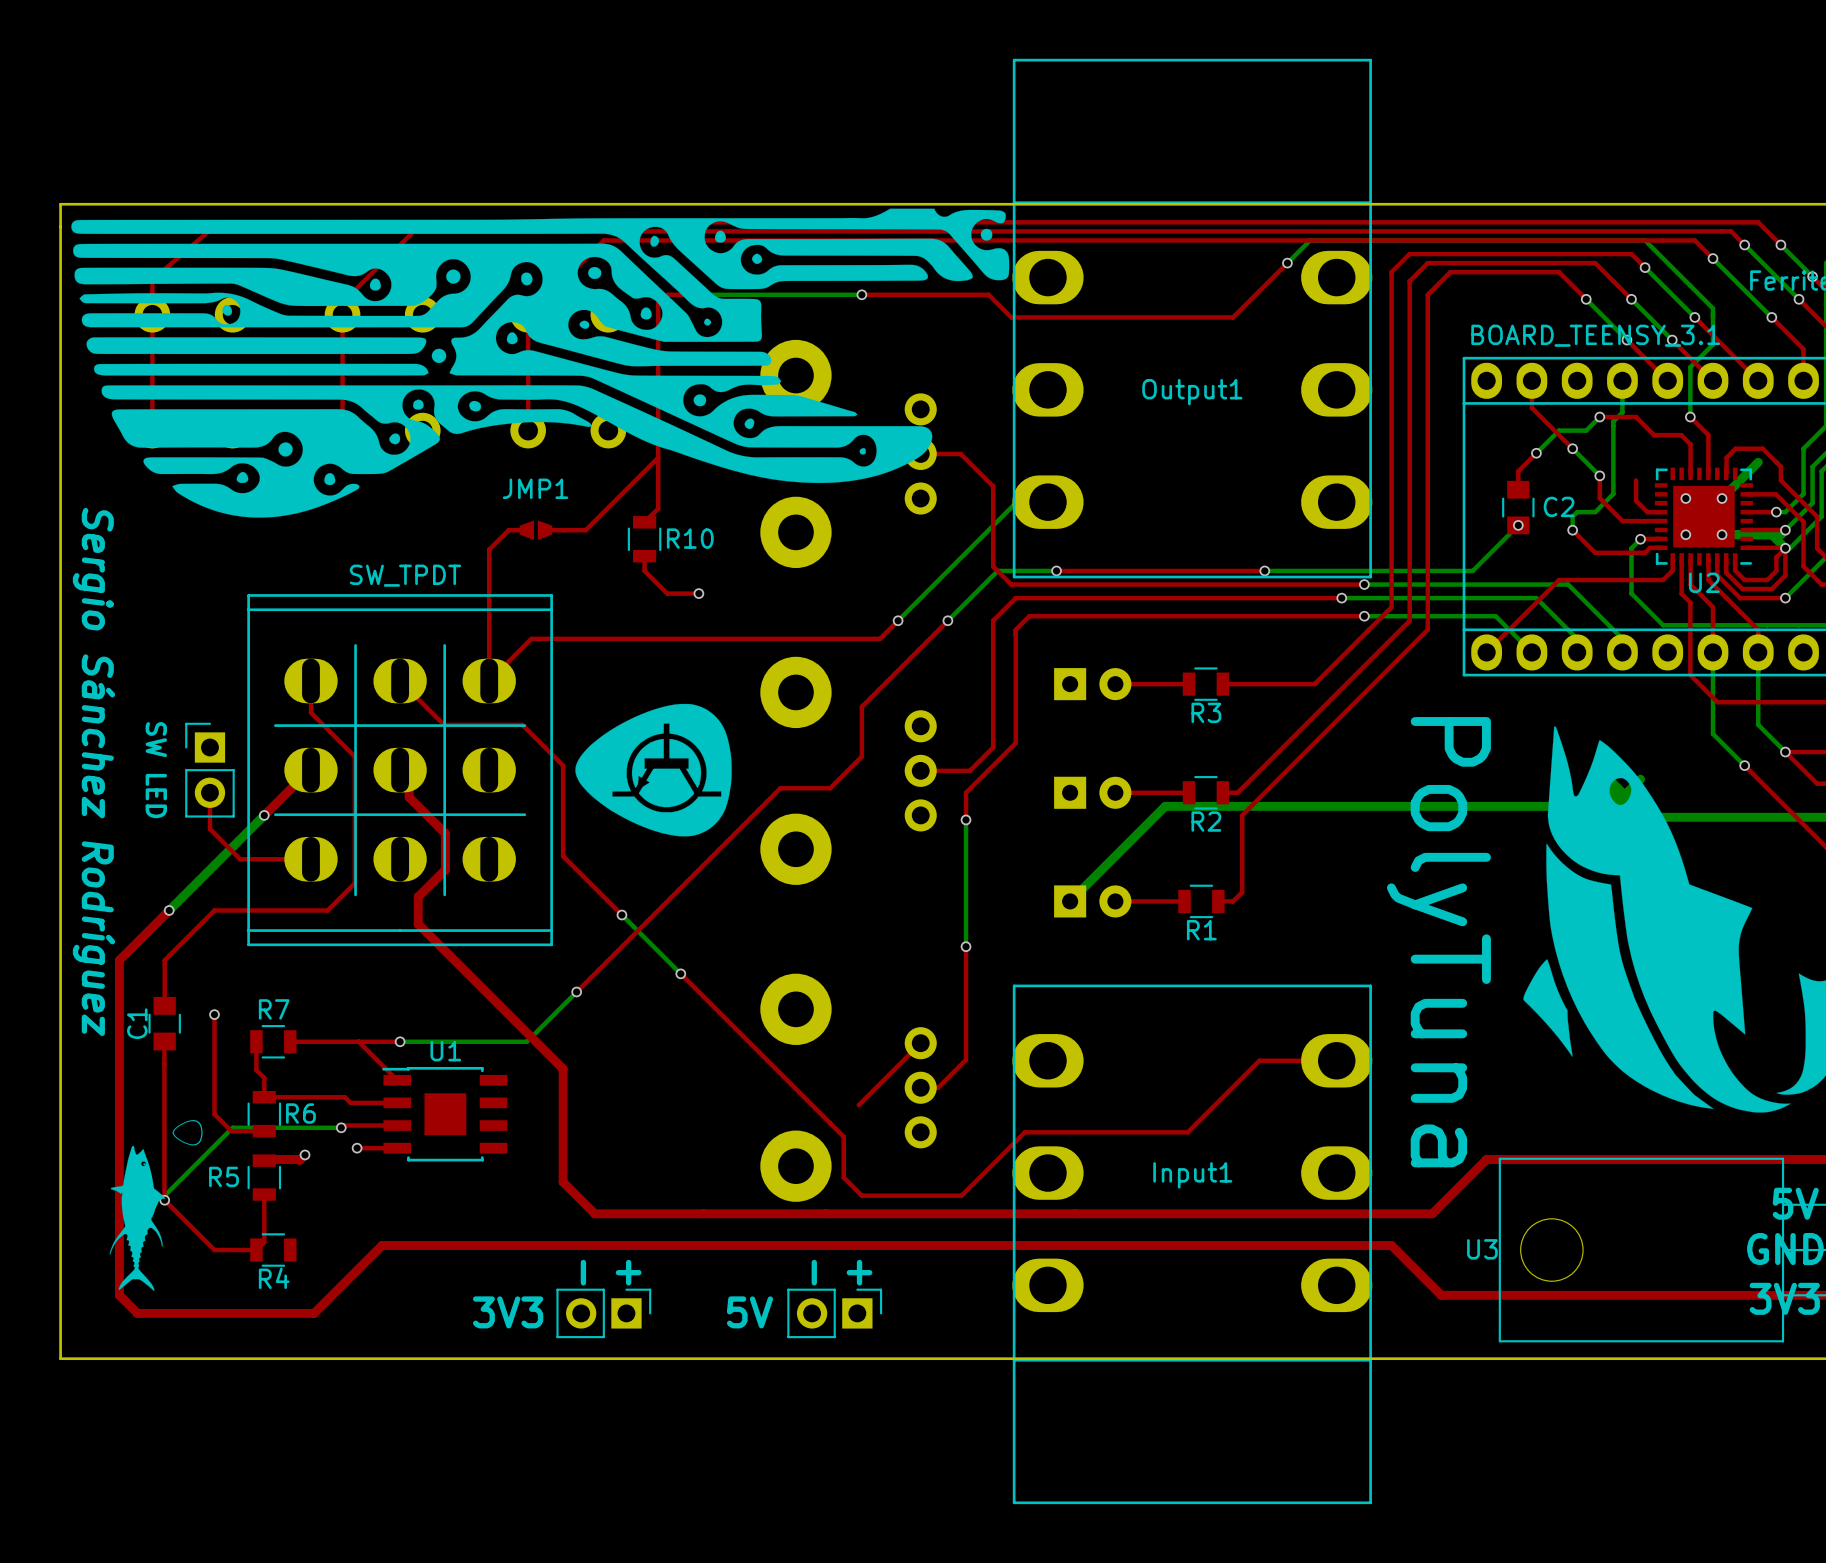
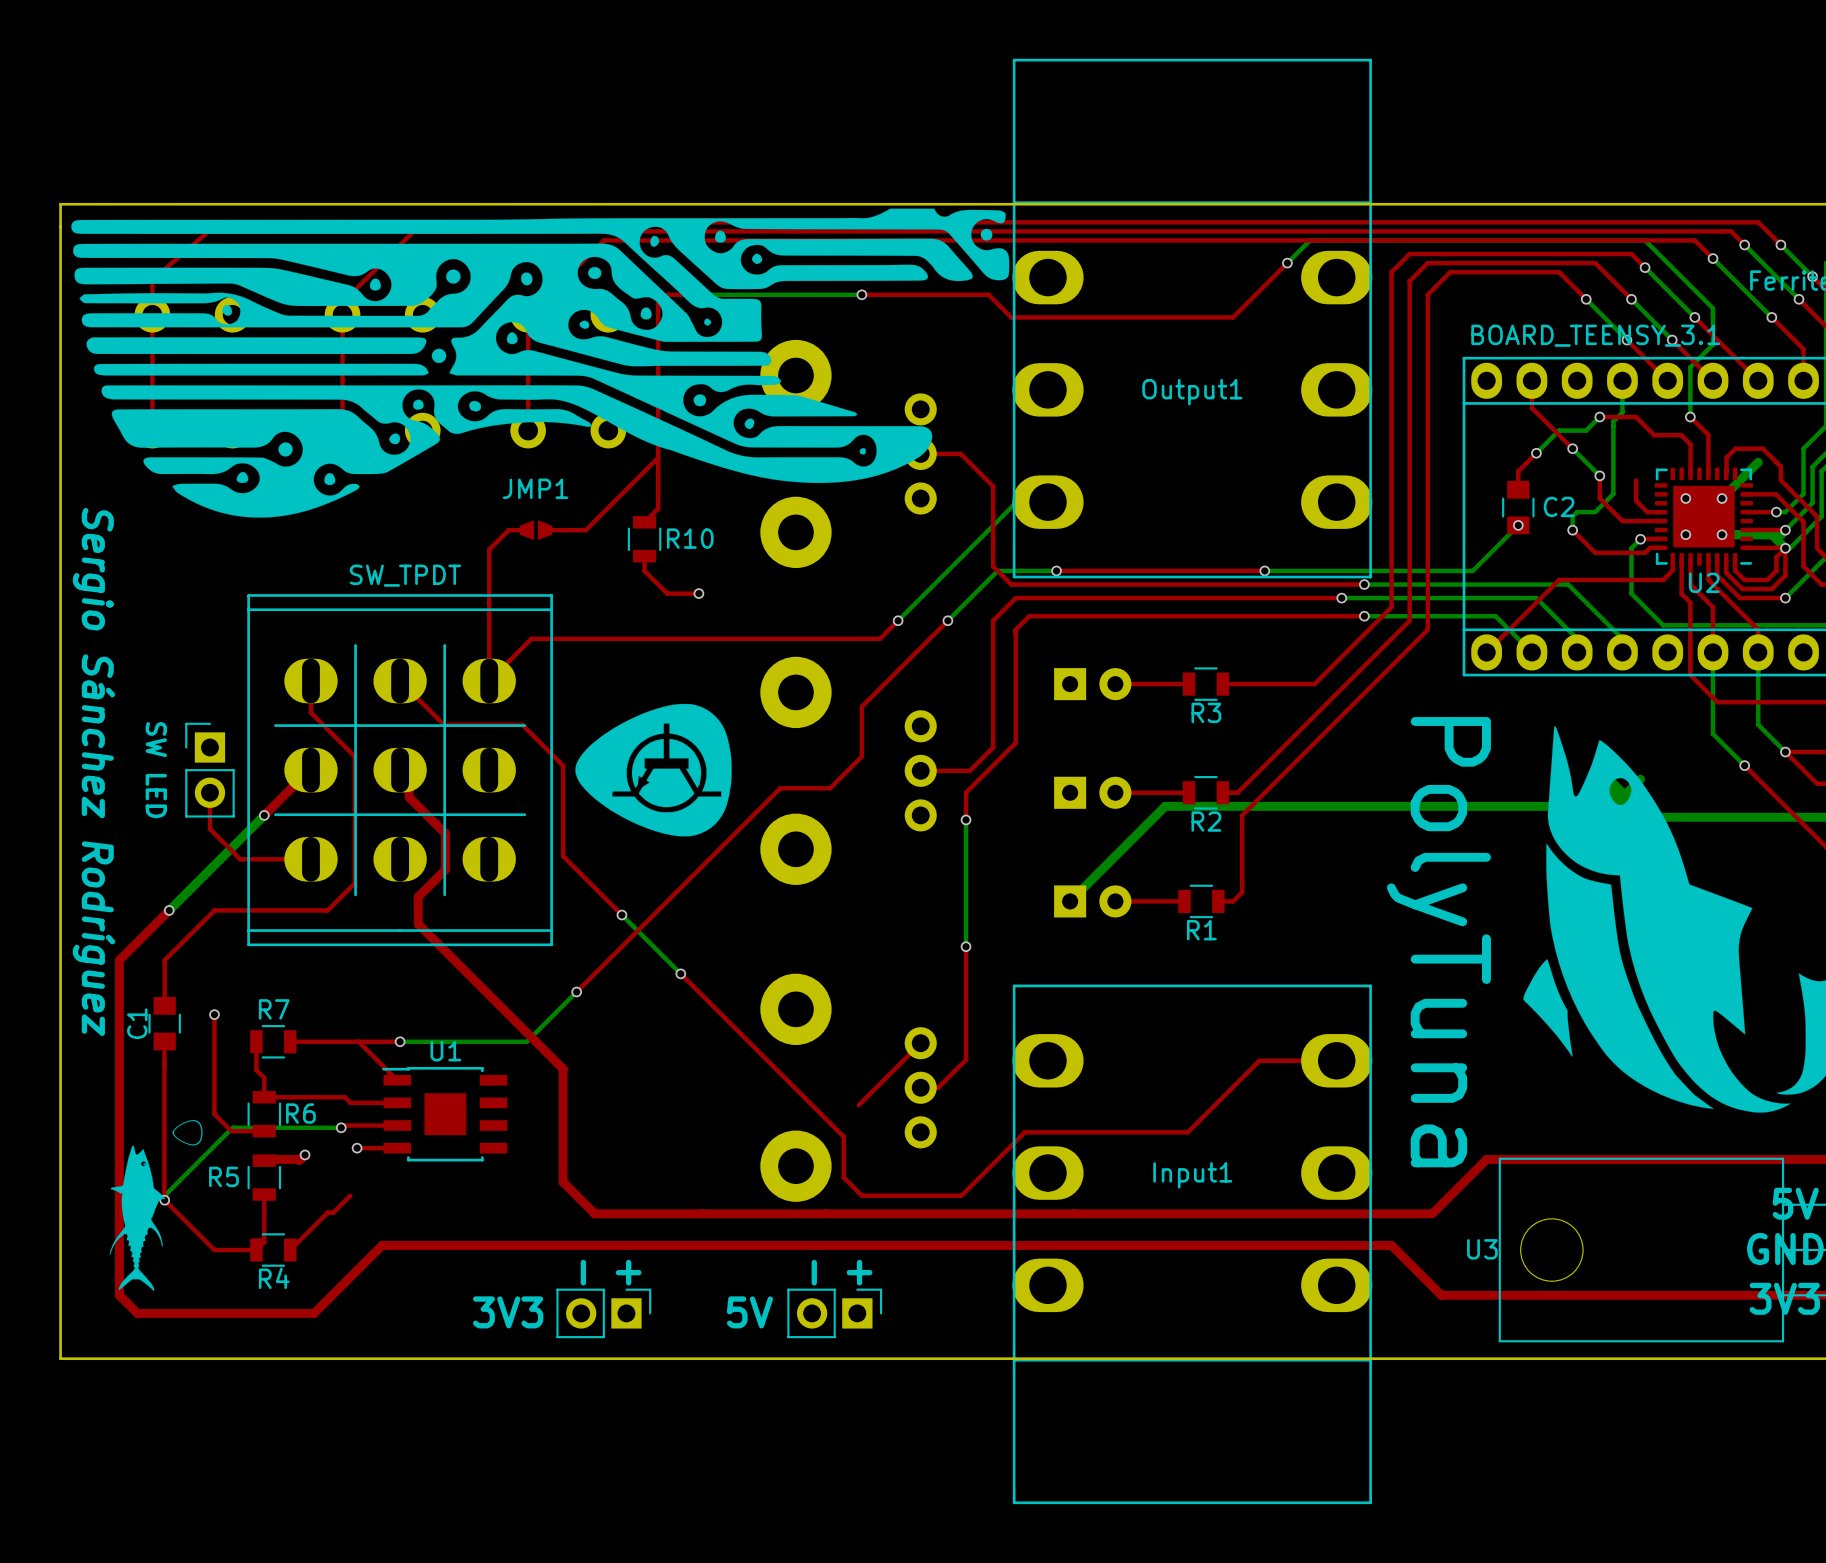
top track: none -> (350, 1195) (333, 1212) (327, 1212) (290, 1250)

